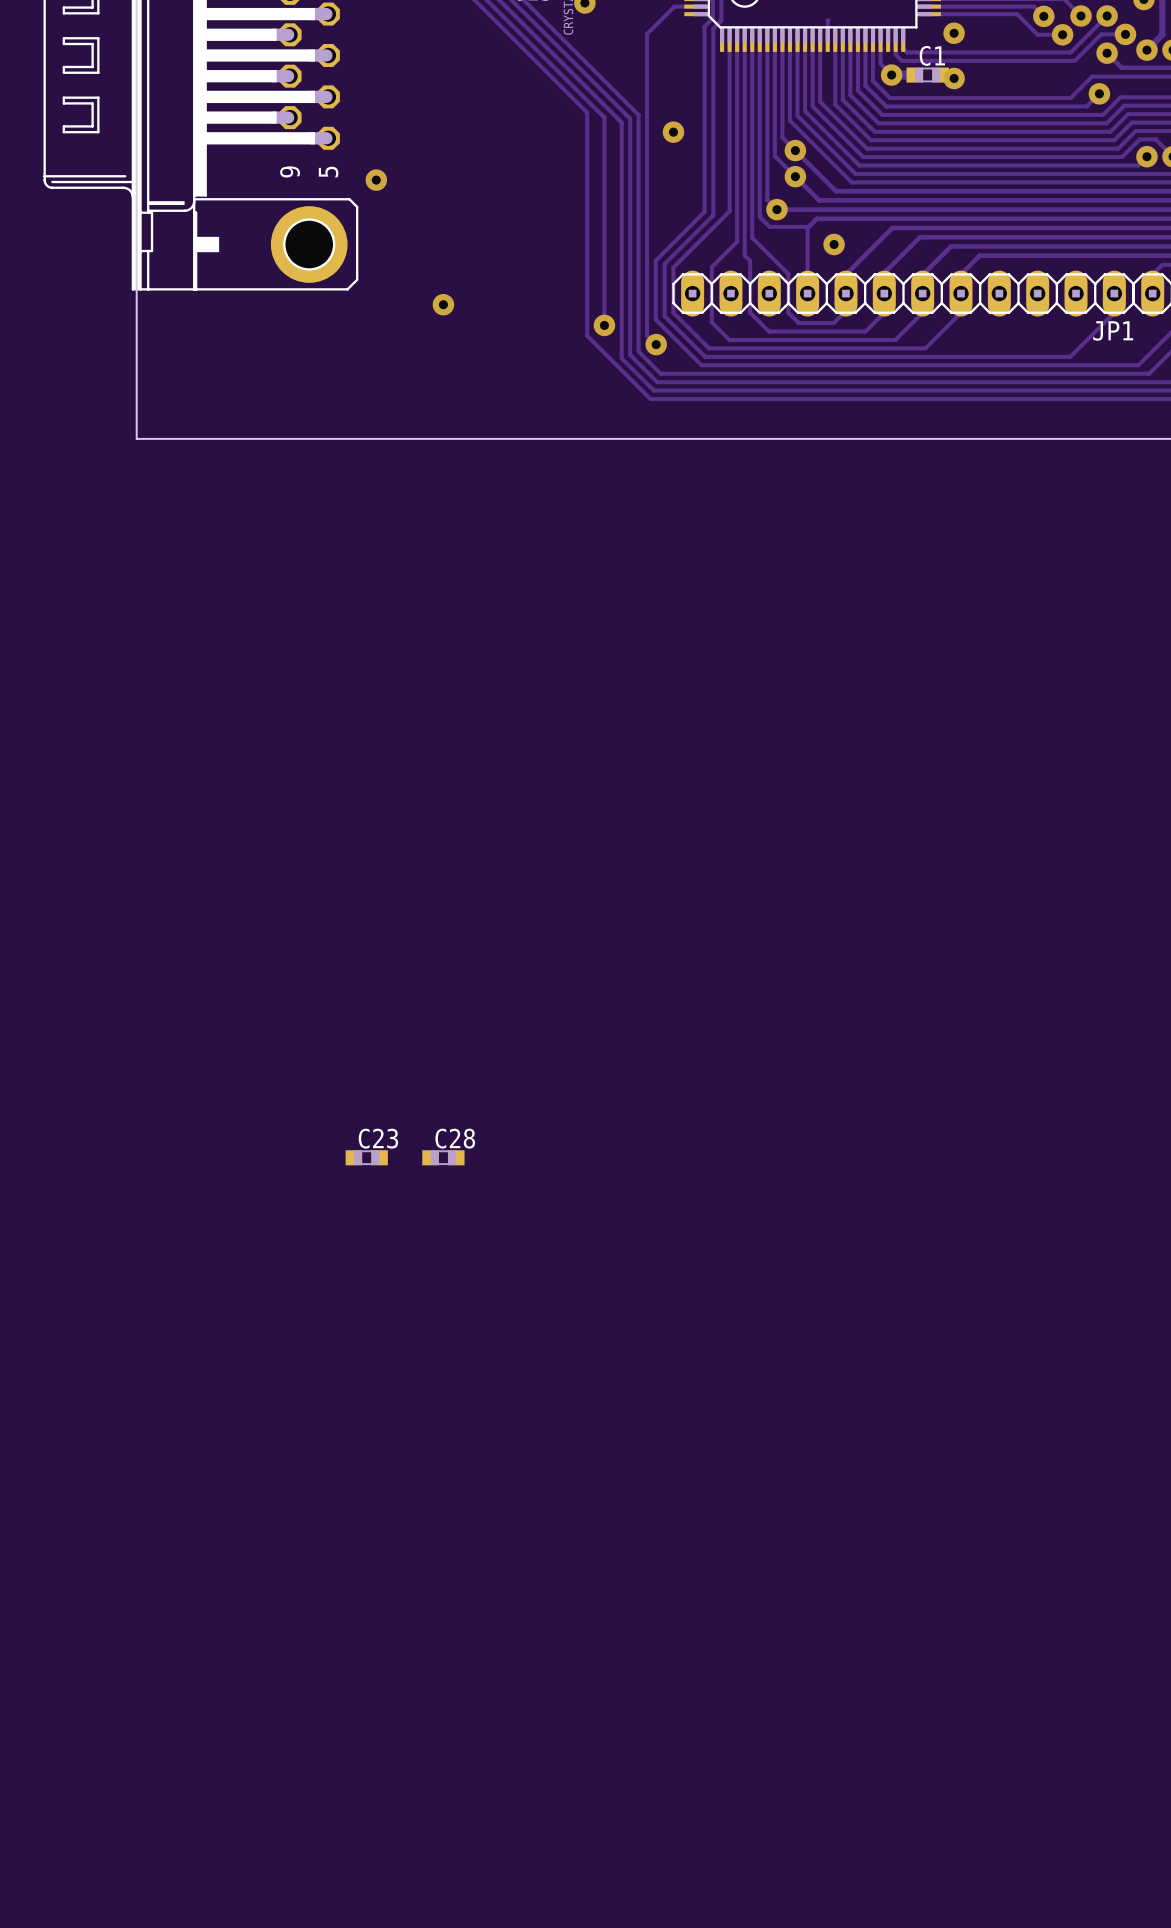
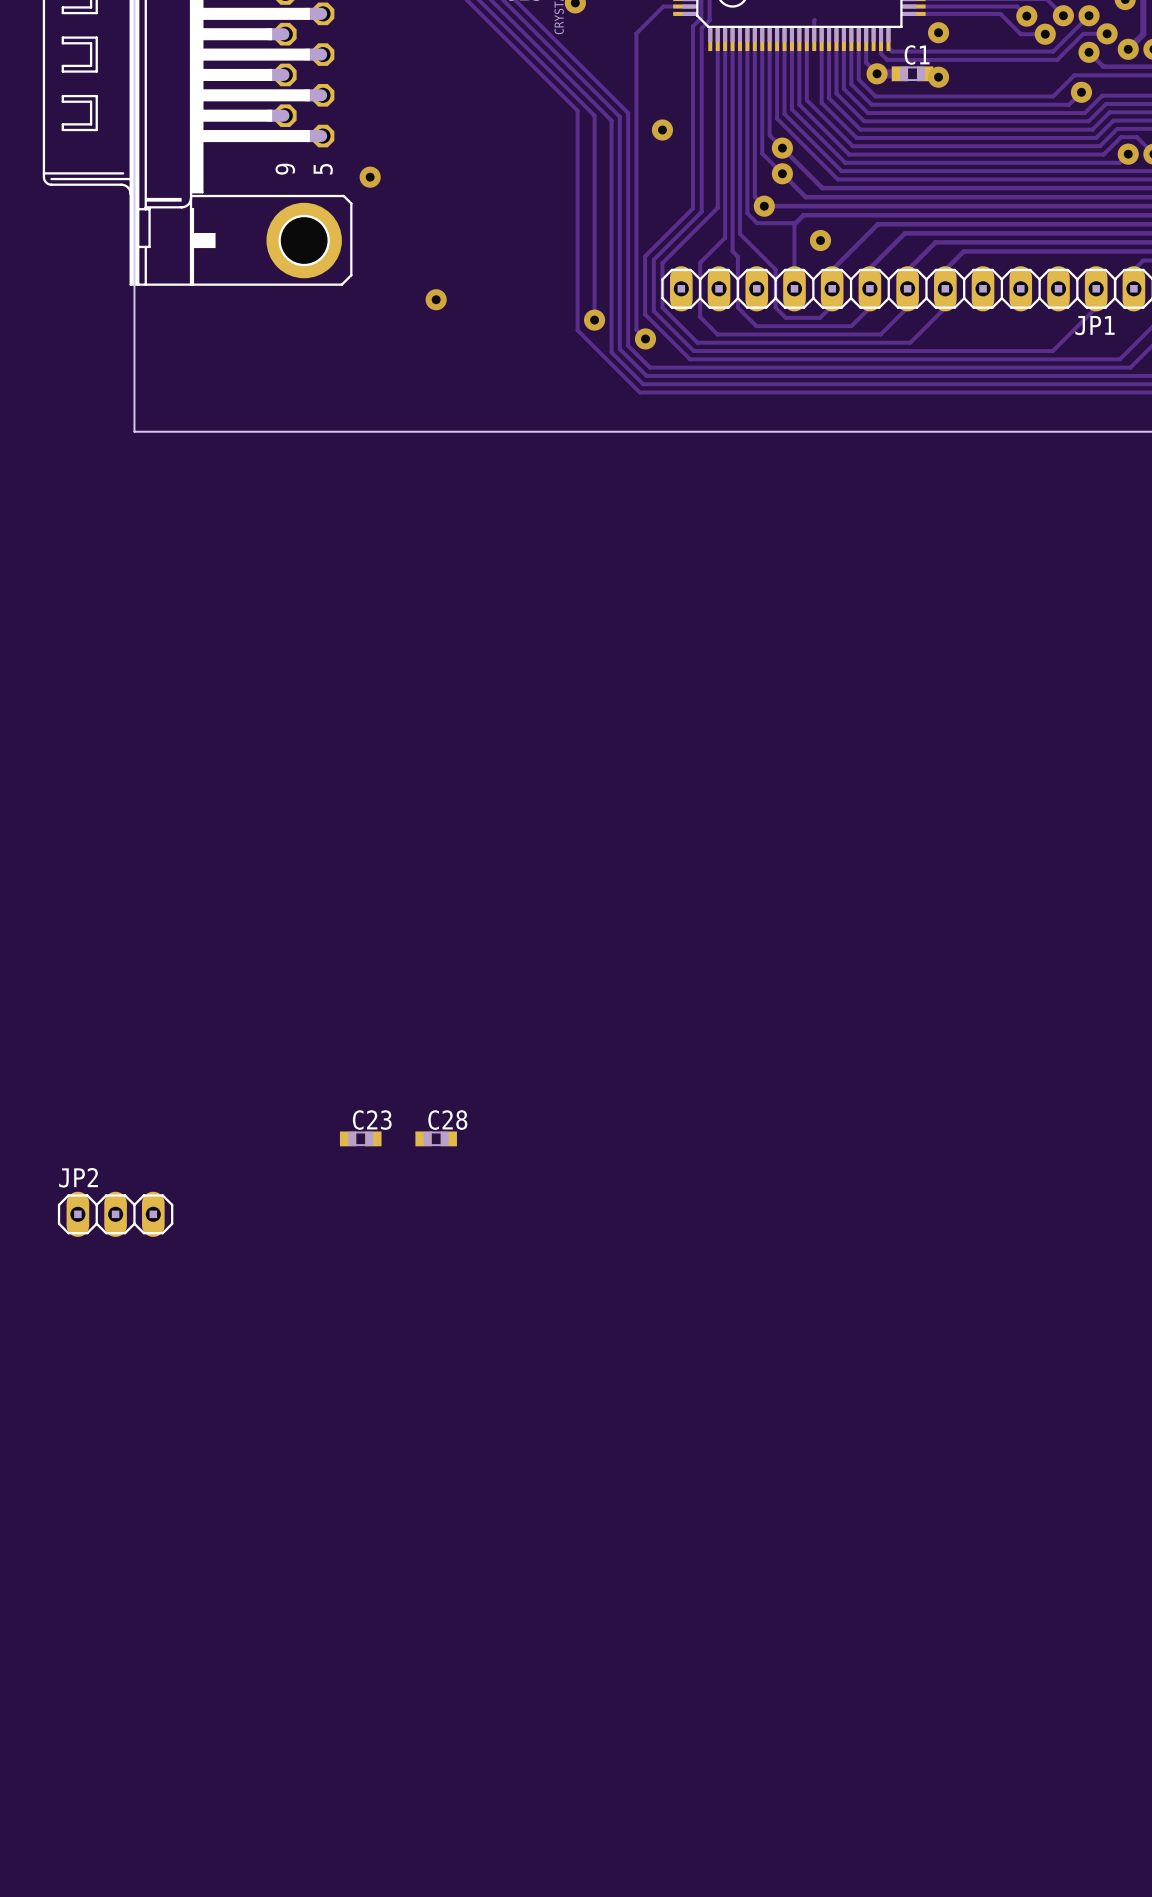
JP2: none -> (115, 1214)

